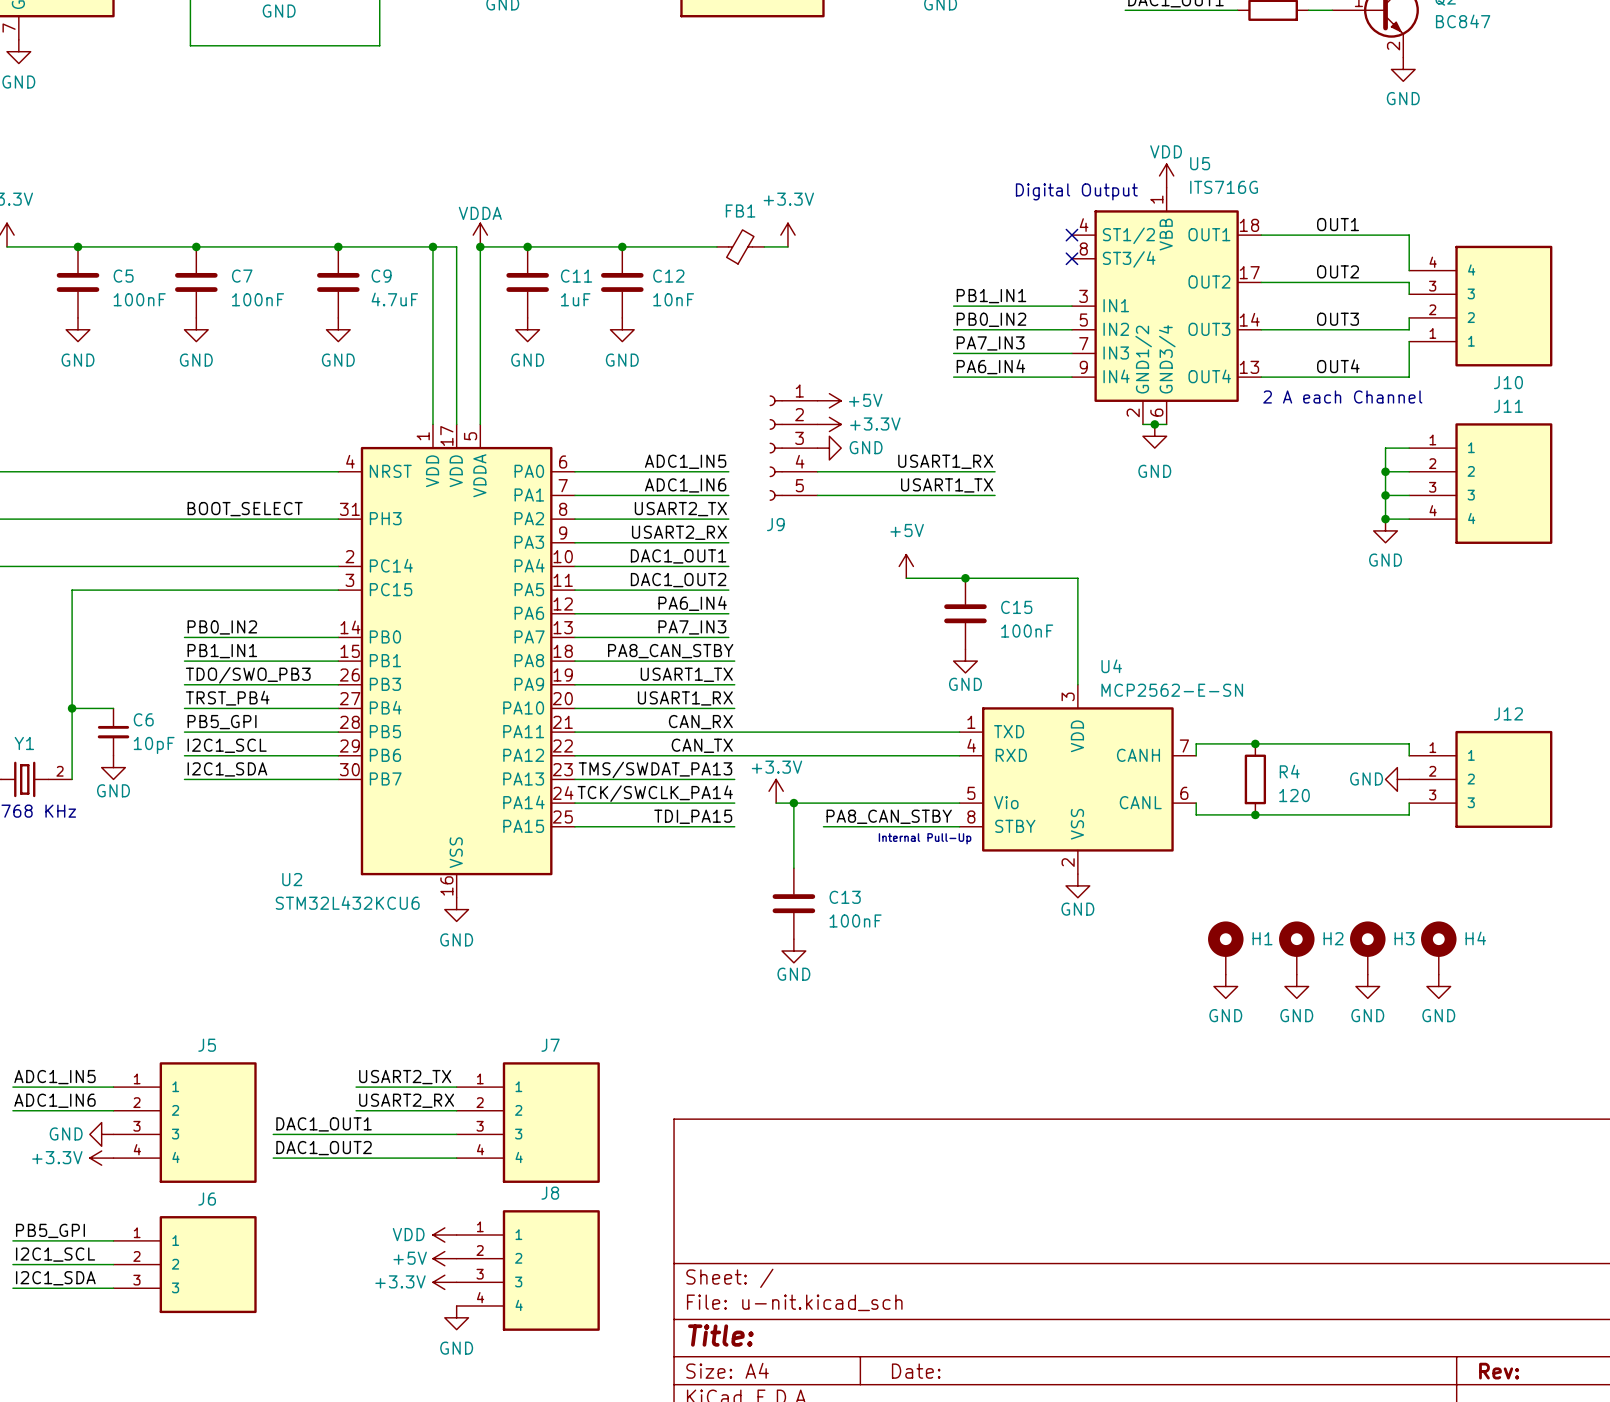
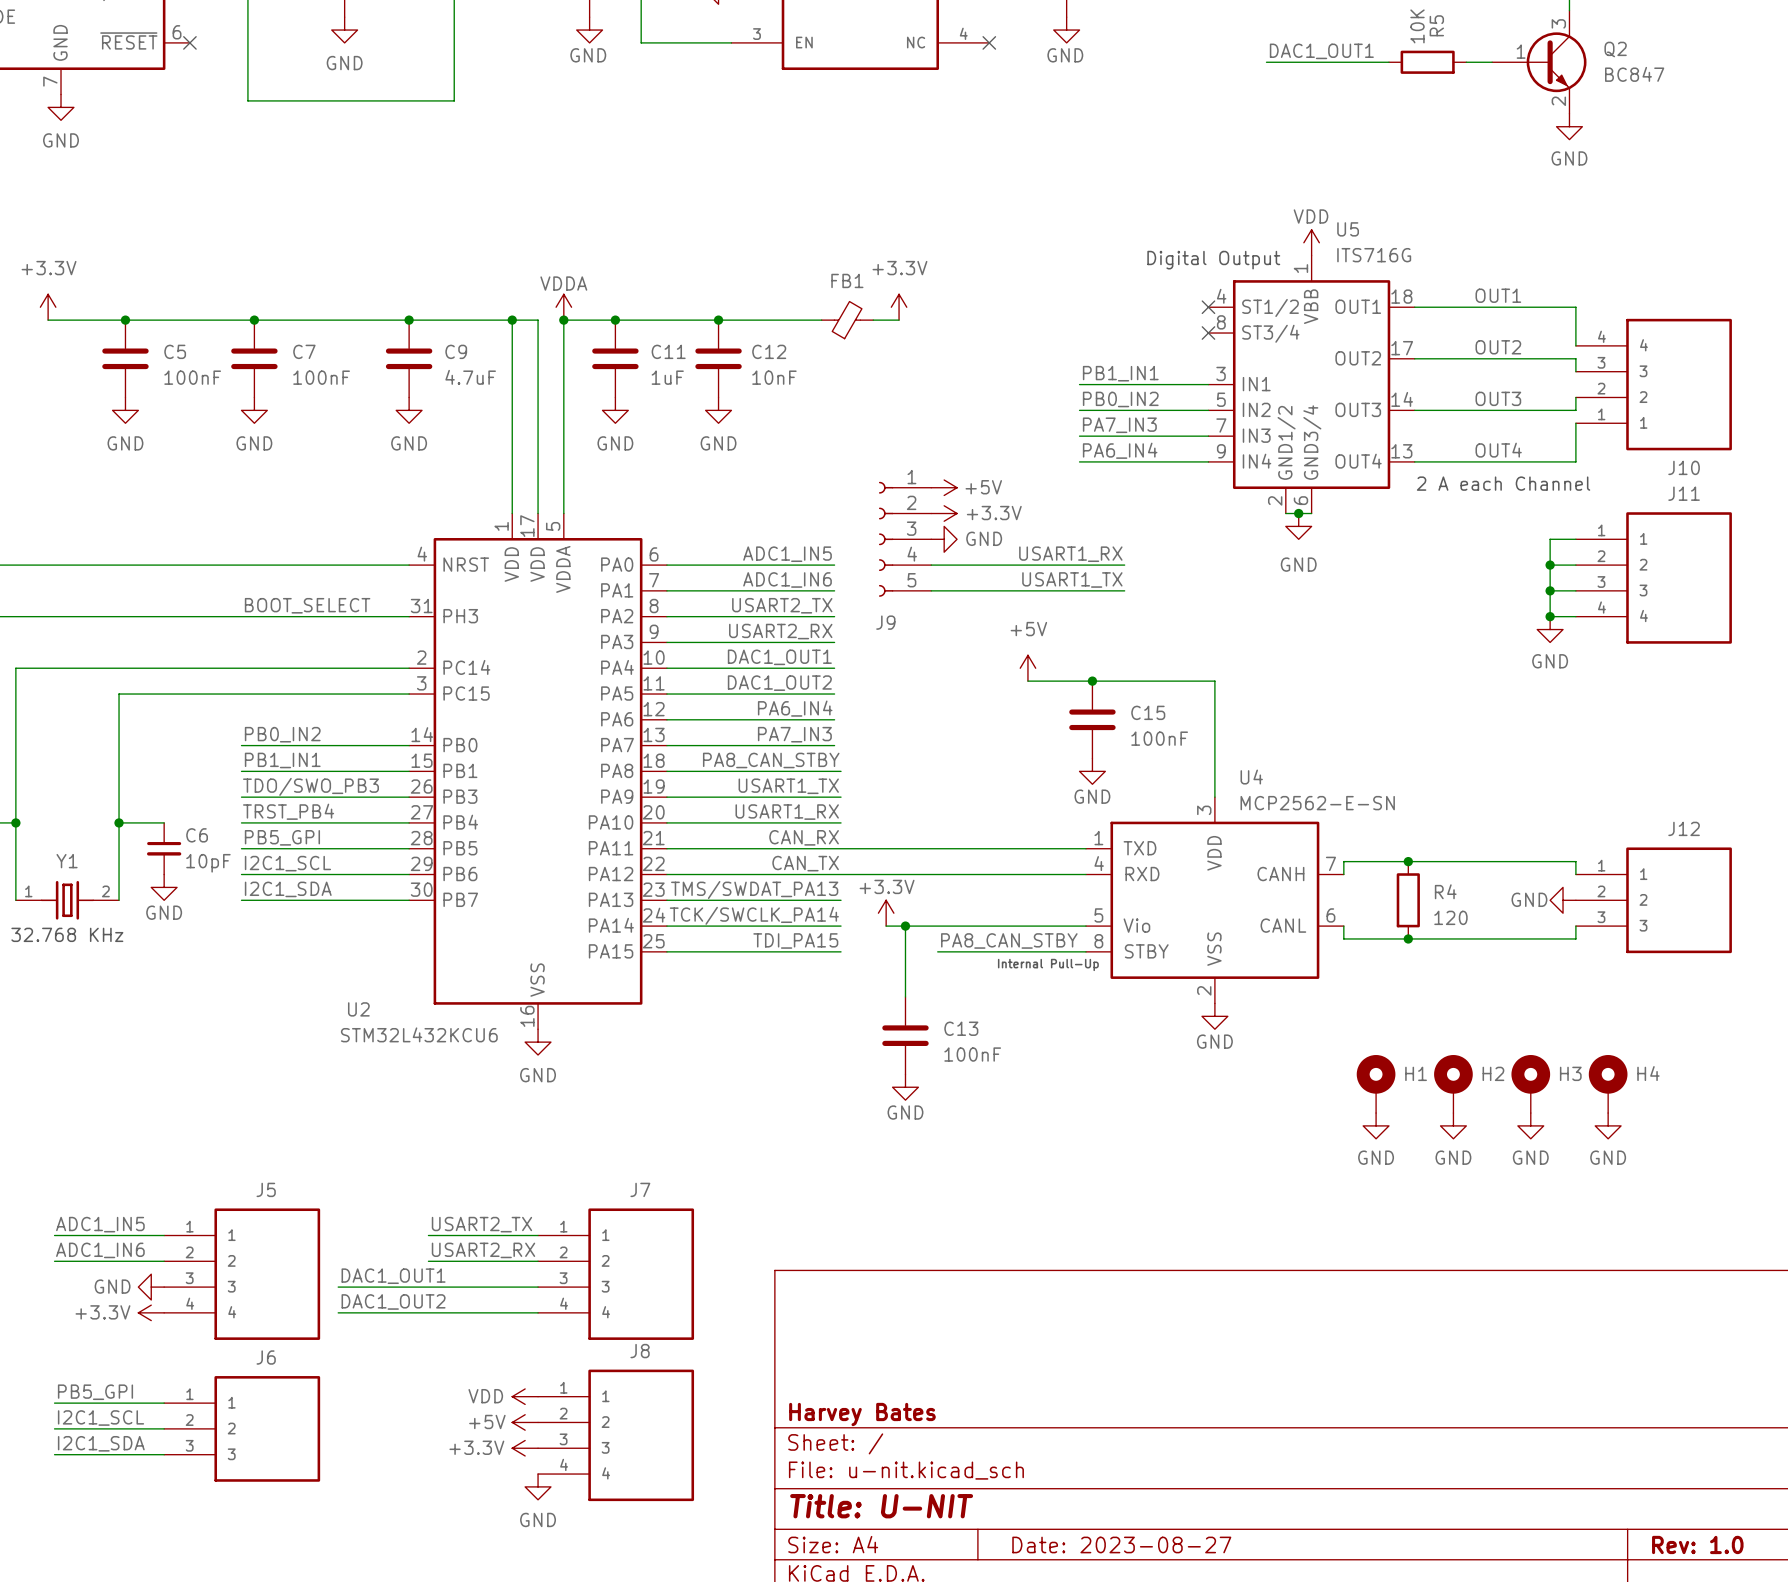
title block: none -> Harvey Bates (862, 1414)
title block: Title: (720, 1335) -> Title: U-NIT (881, 1506)
title block: Date: (916, 1371) -> Date: 2023-08-27 (1121, 1544)
title block: Rev: (1499, 1371) -> Rev: 1.0 (1697, 1544)

